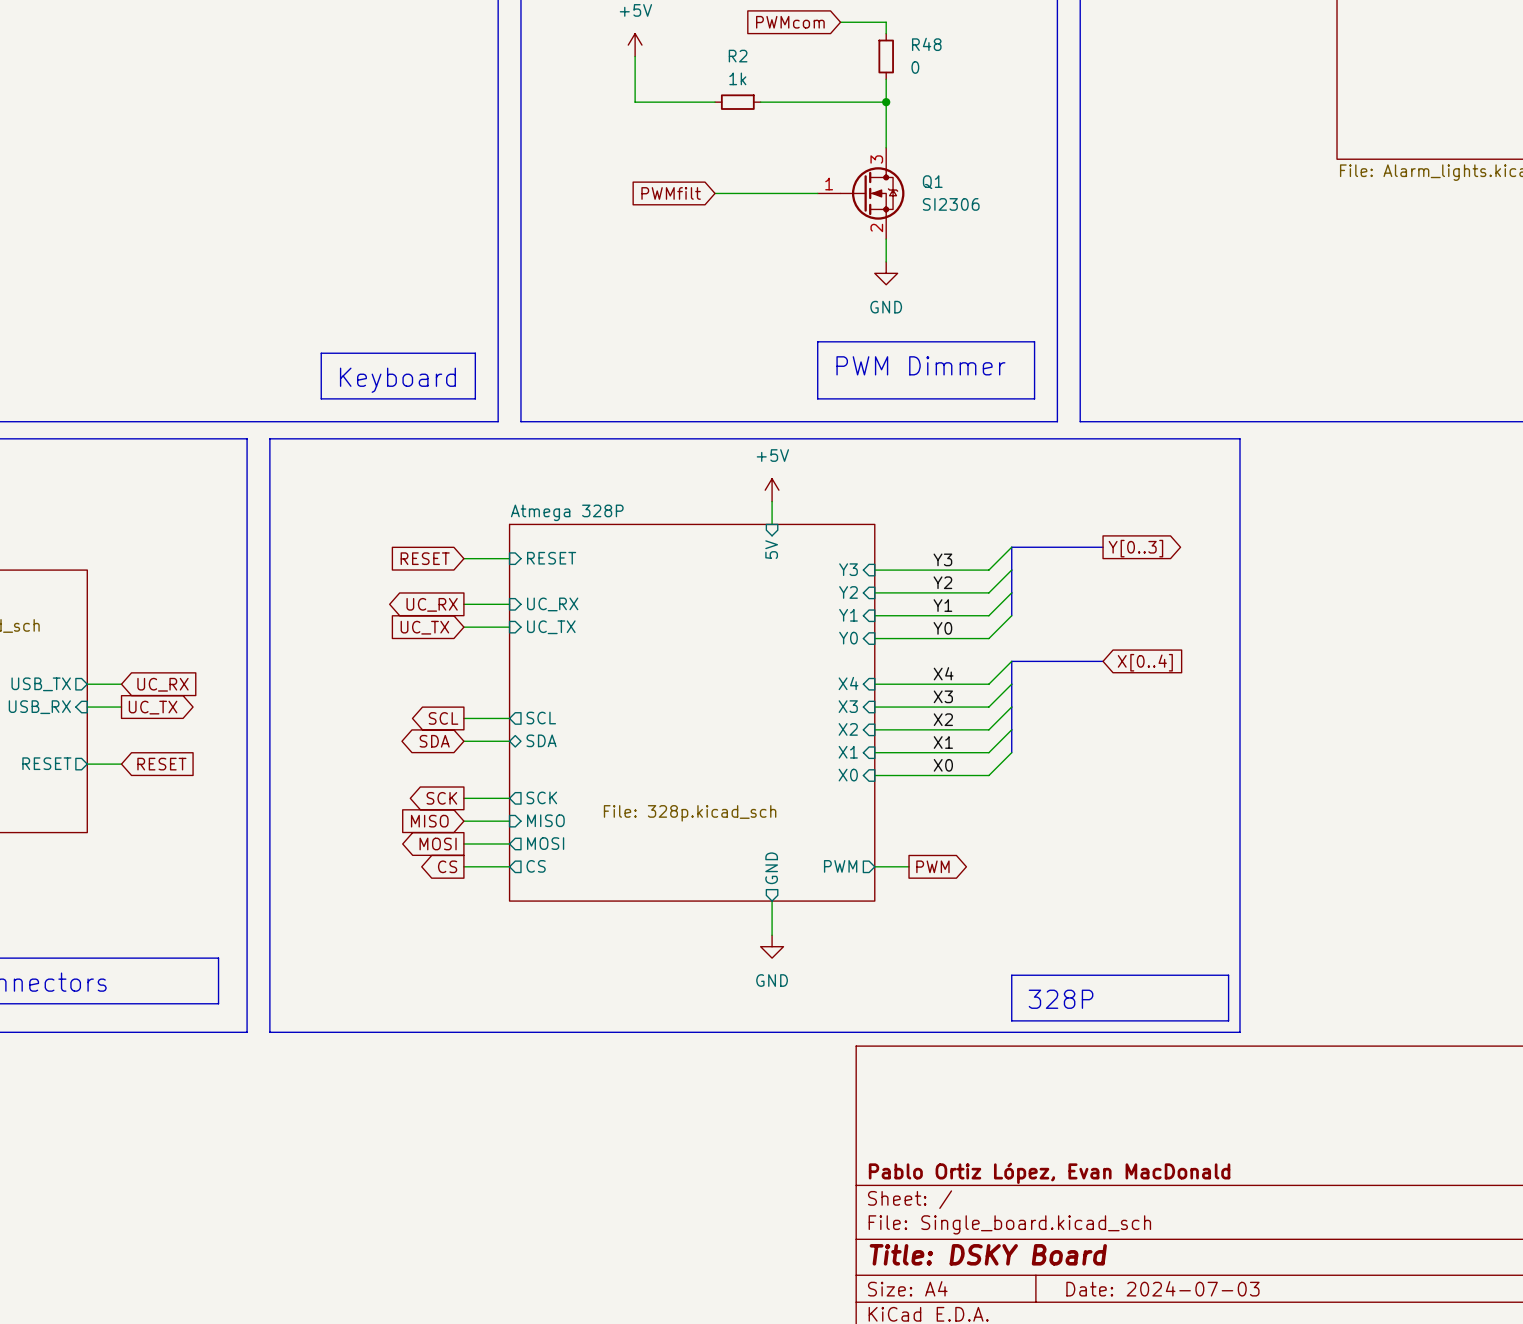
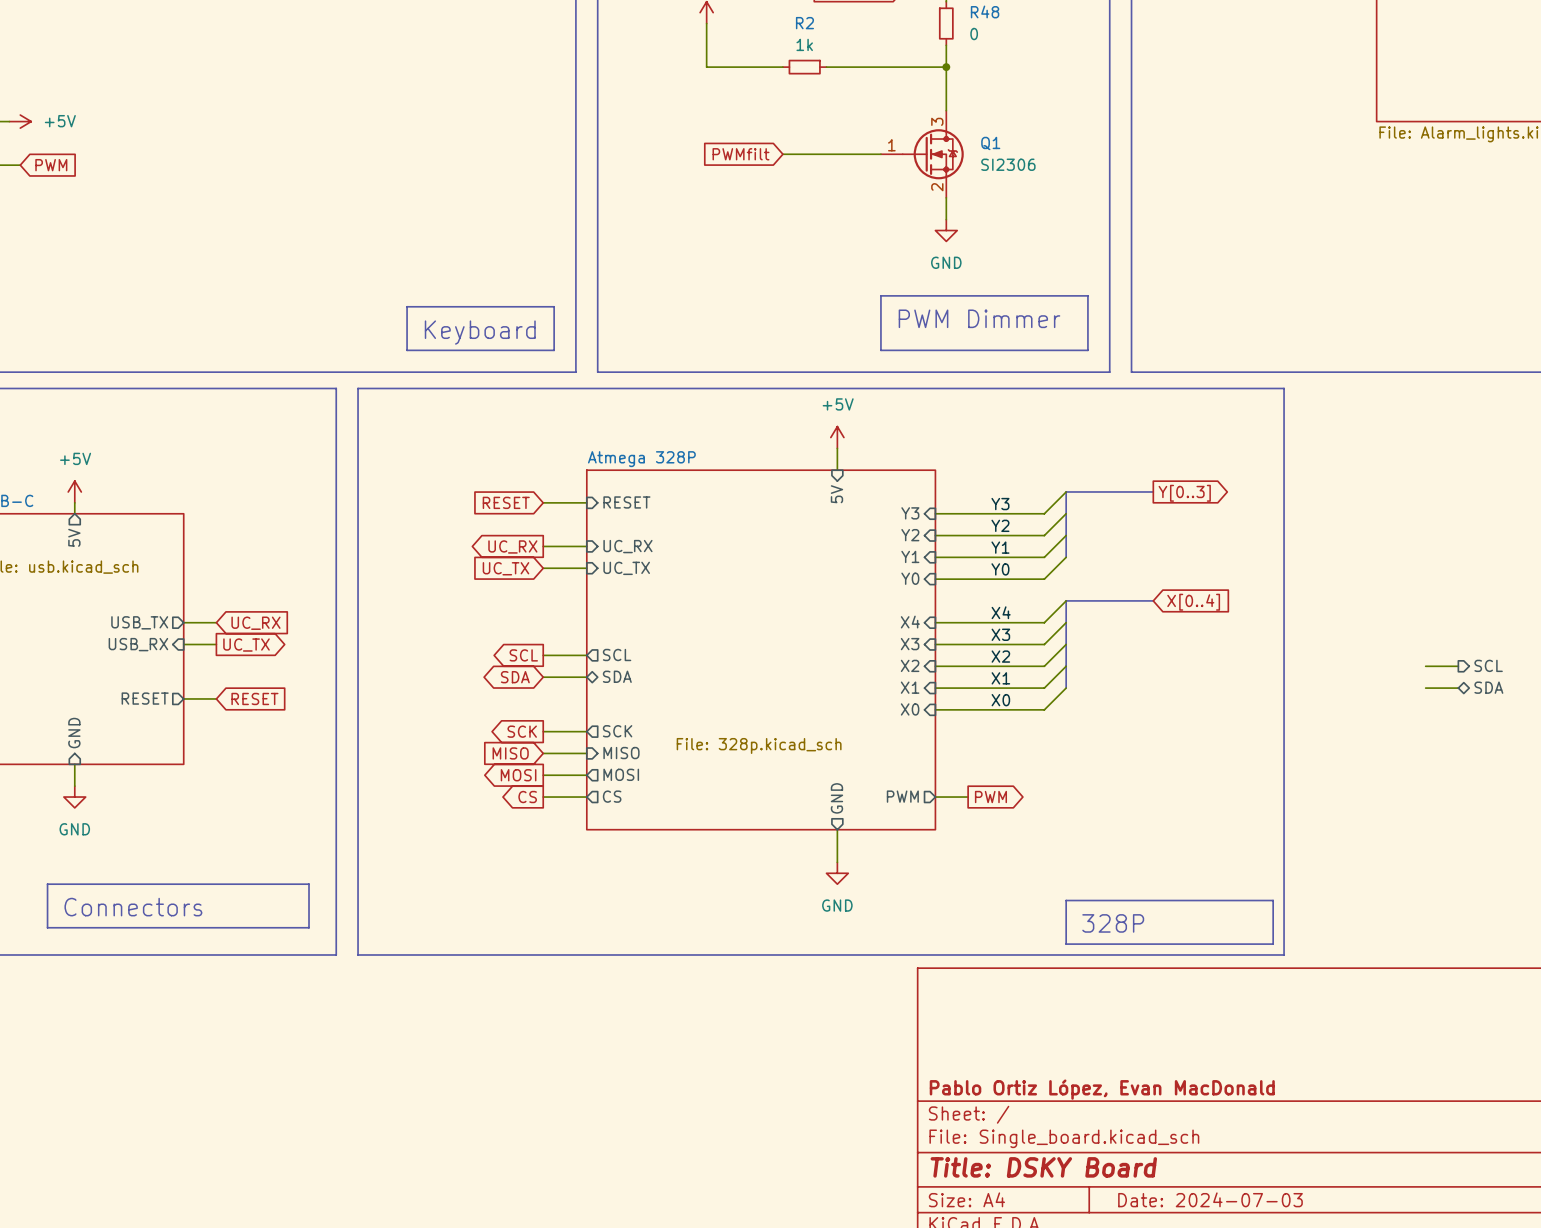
wire: none -> (1425, 666) (1458, 666)
sheet pin: none -> SCL (1488, 665)
wire: none -> (1425, 688) (1458, 688)
sheet pin: none -> SDA (1488, 687)

